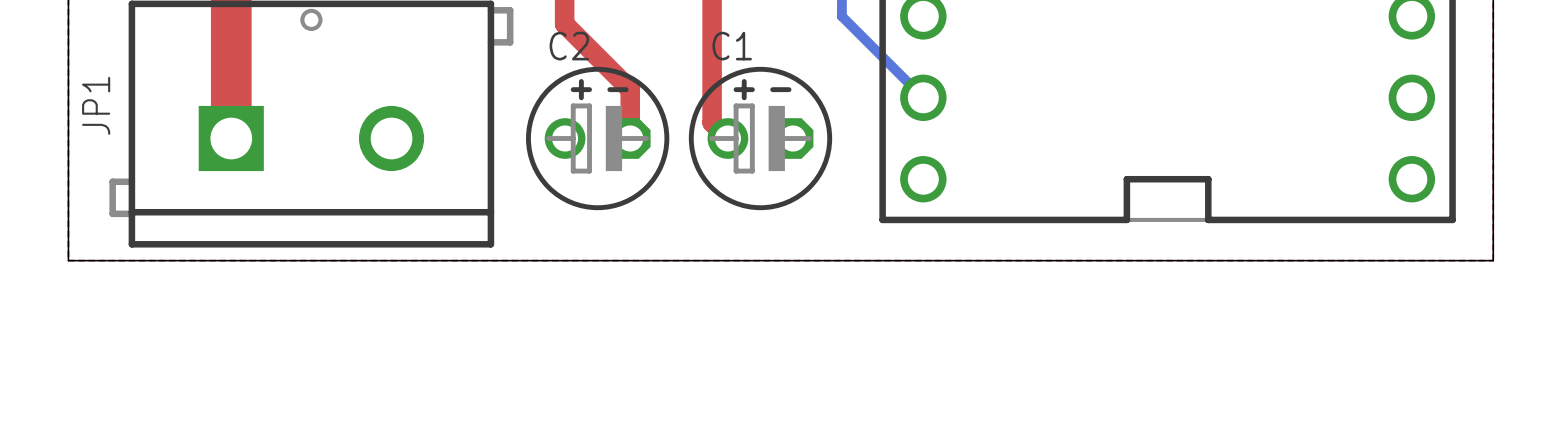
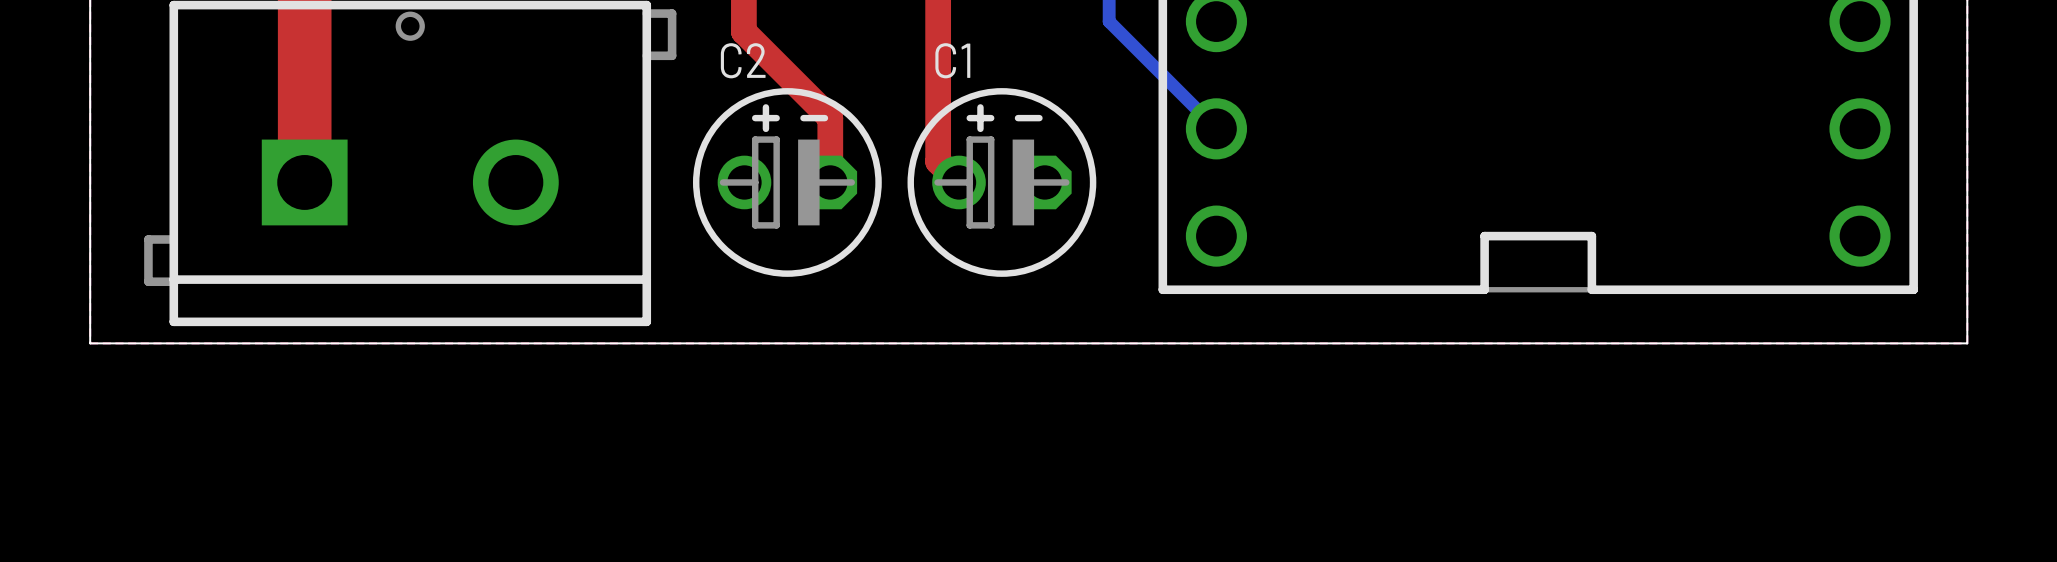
JP1 name: JP1 (96, 105) -> none

